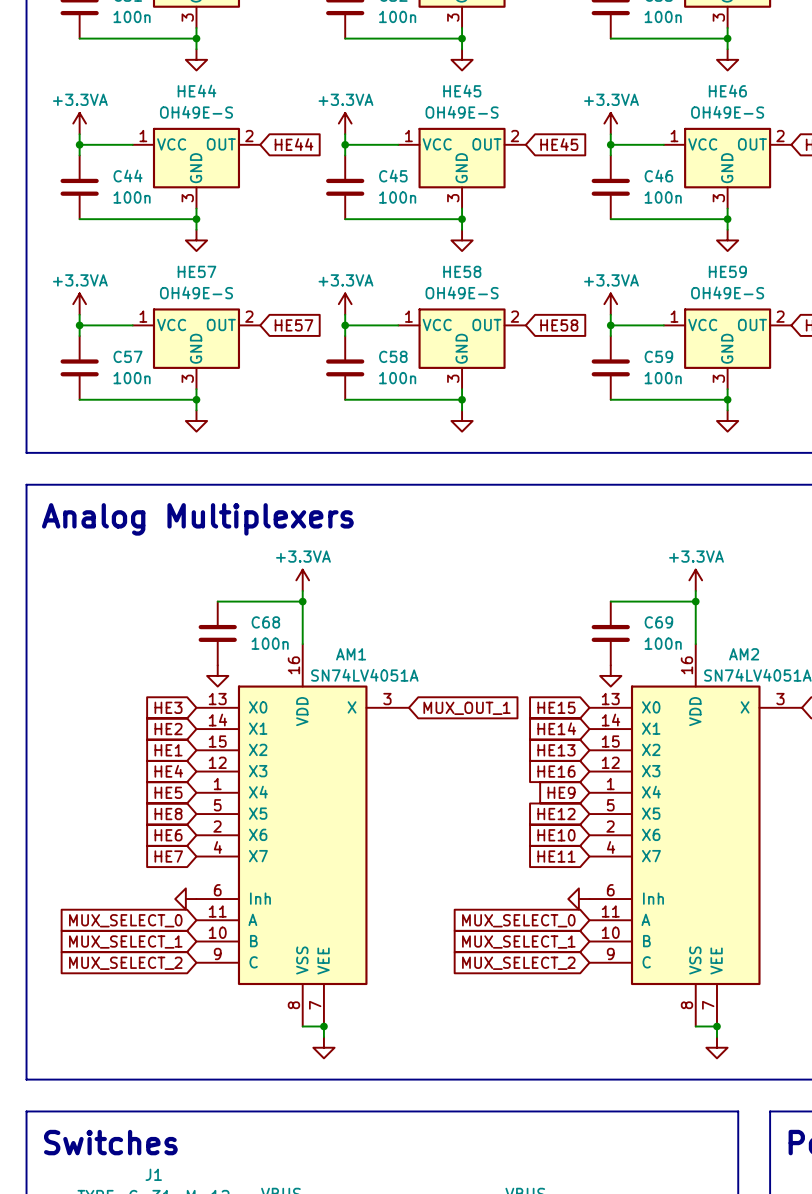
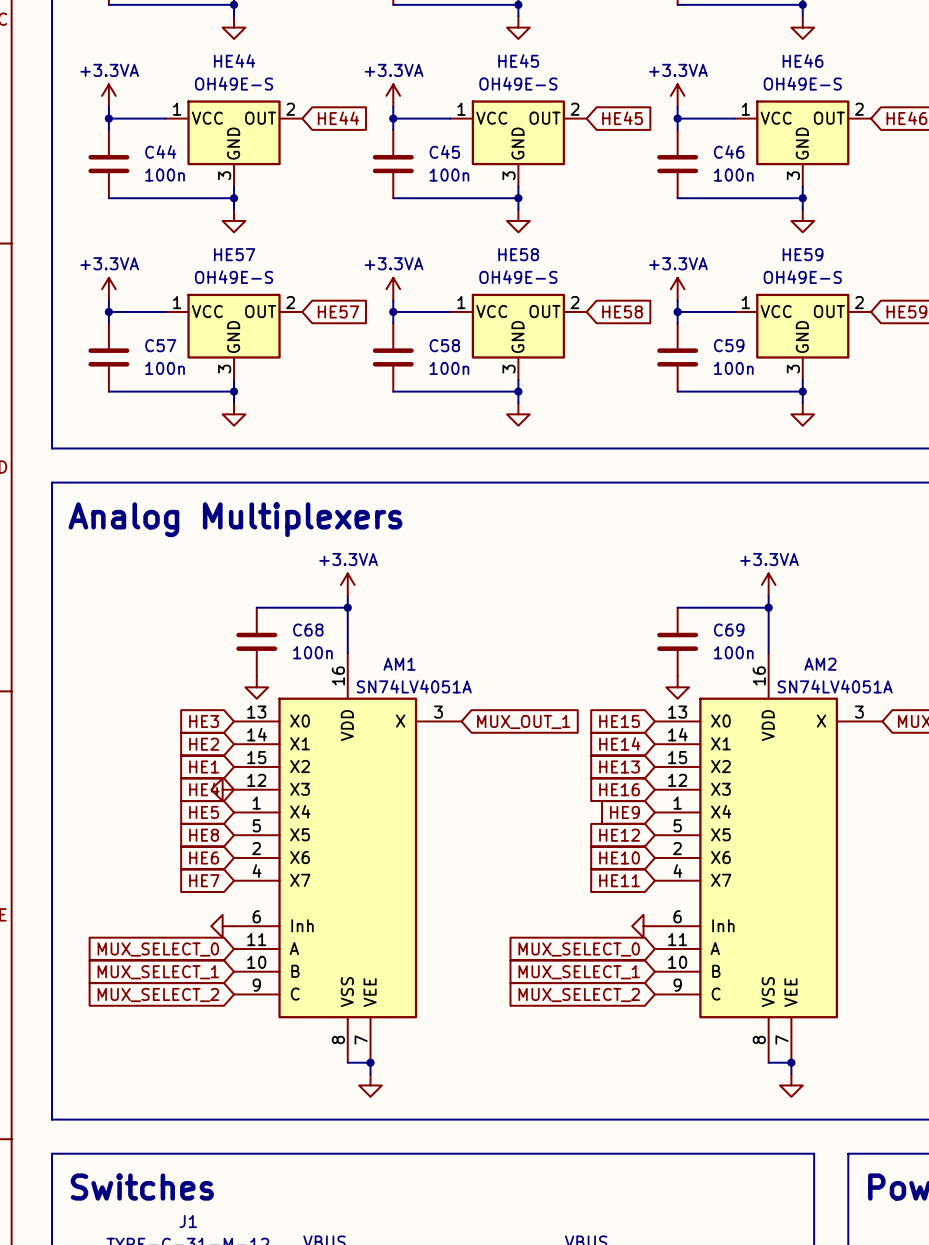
power symbol: none -> (222, 789)

